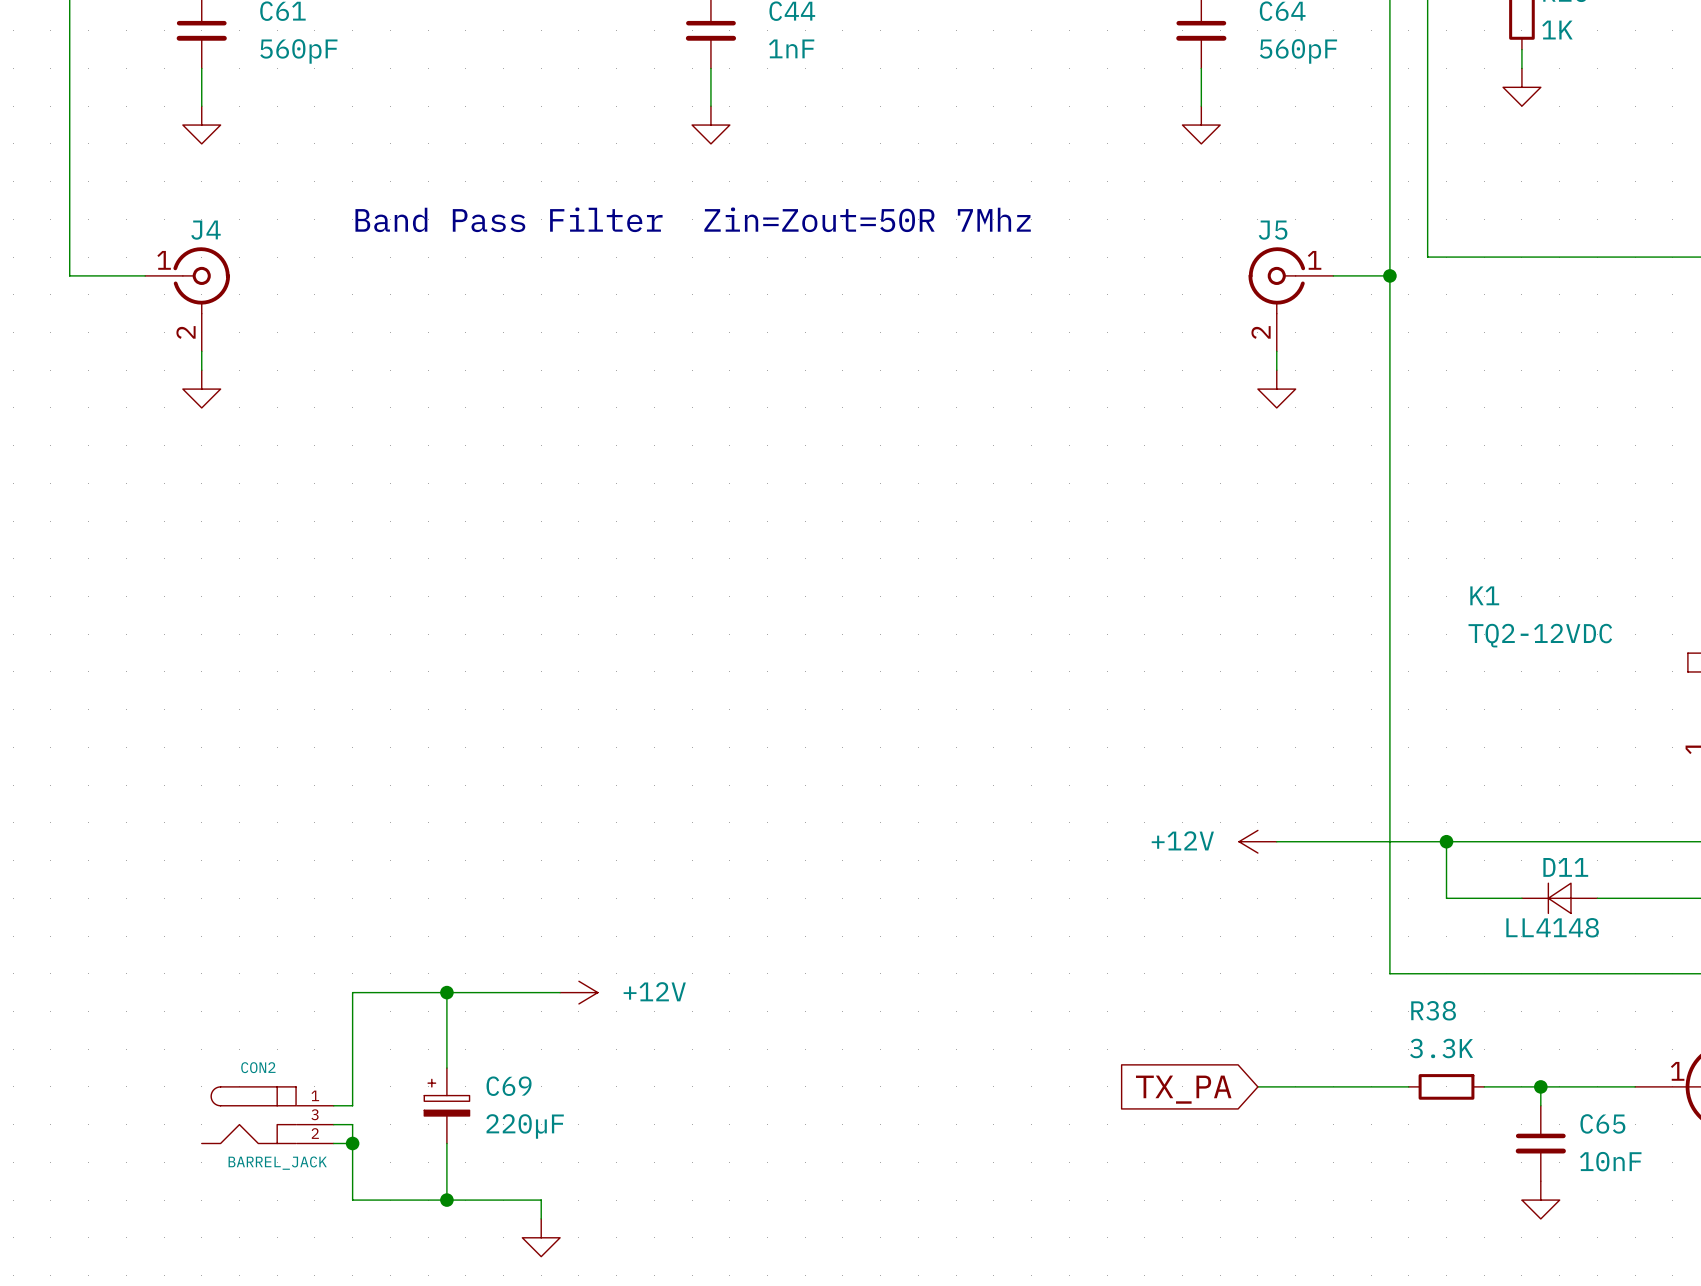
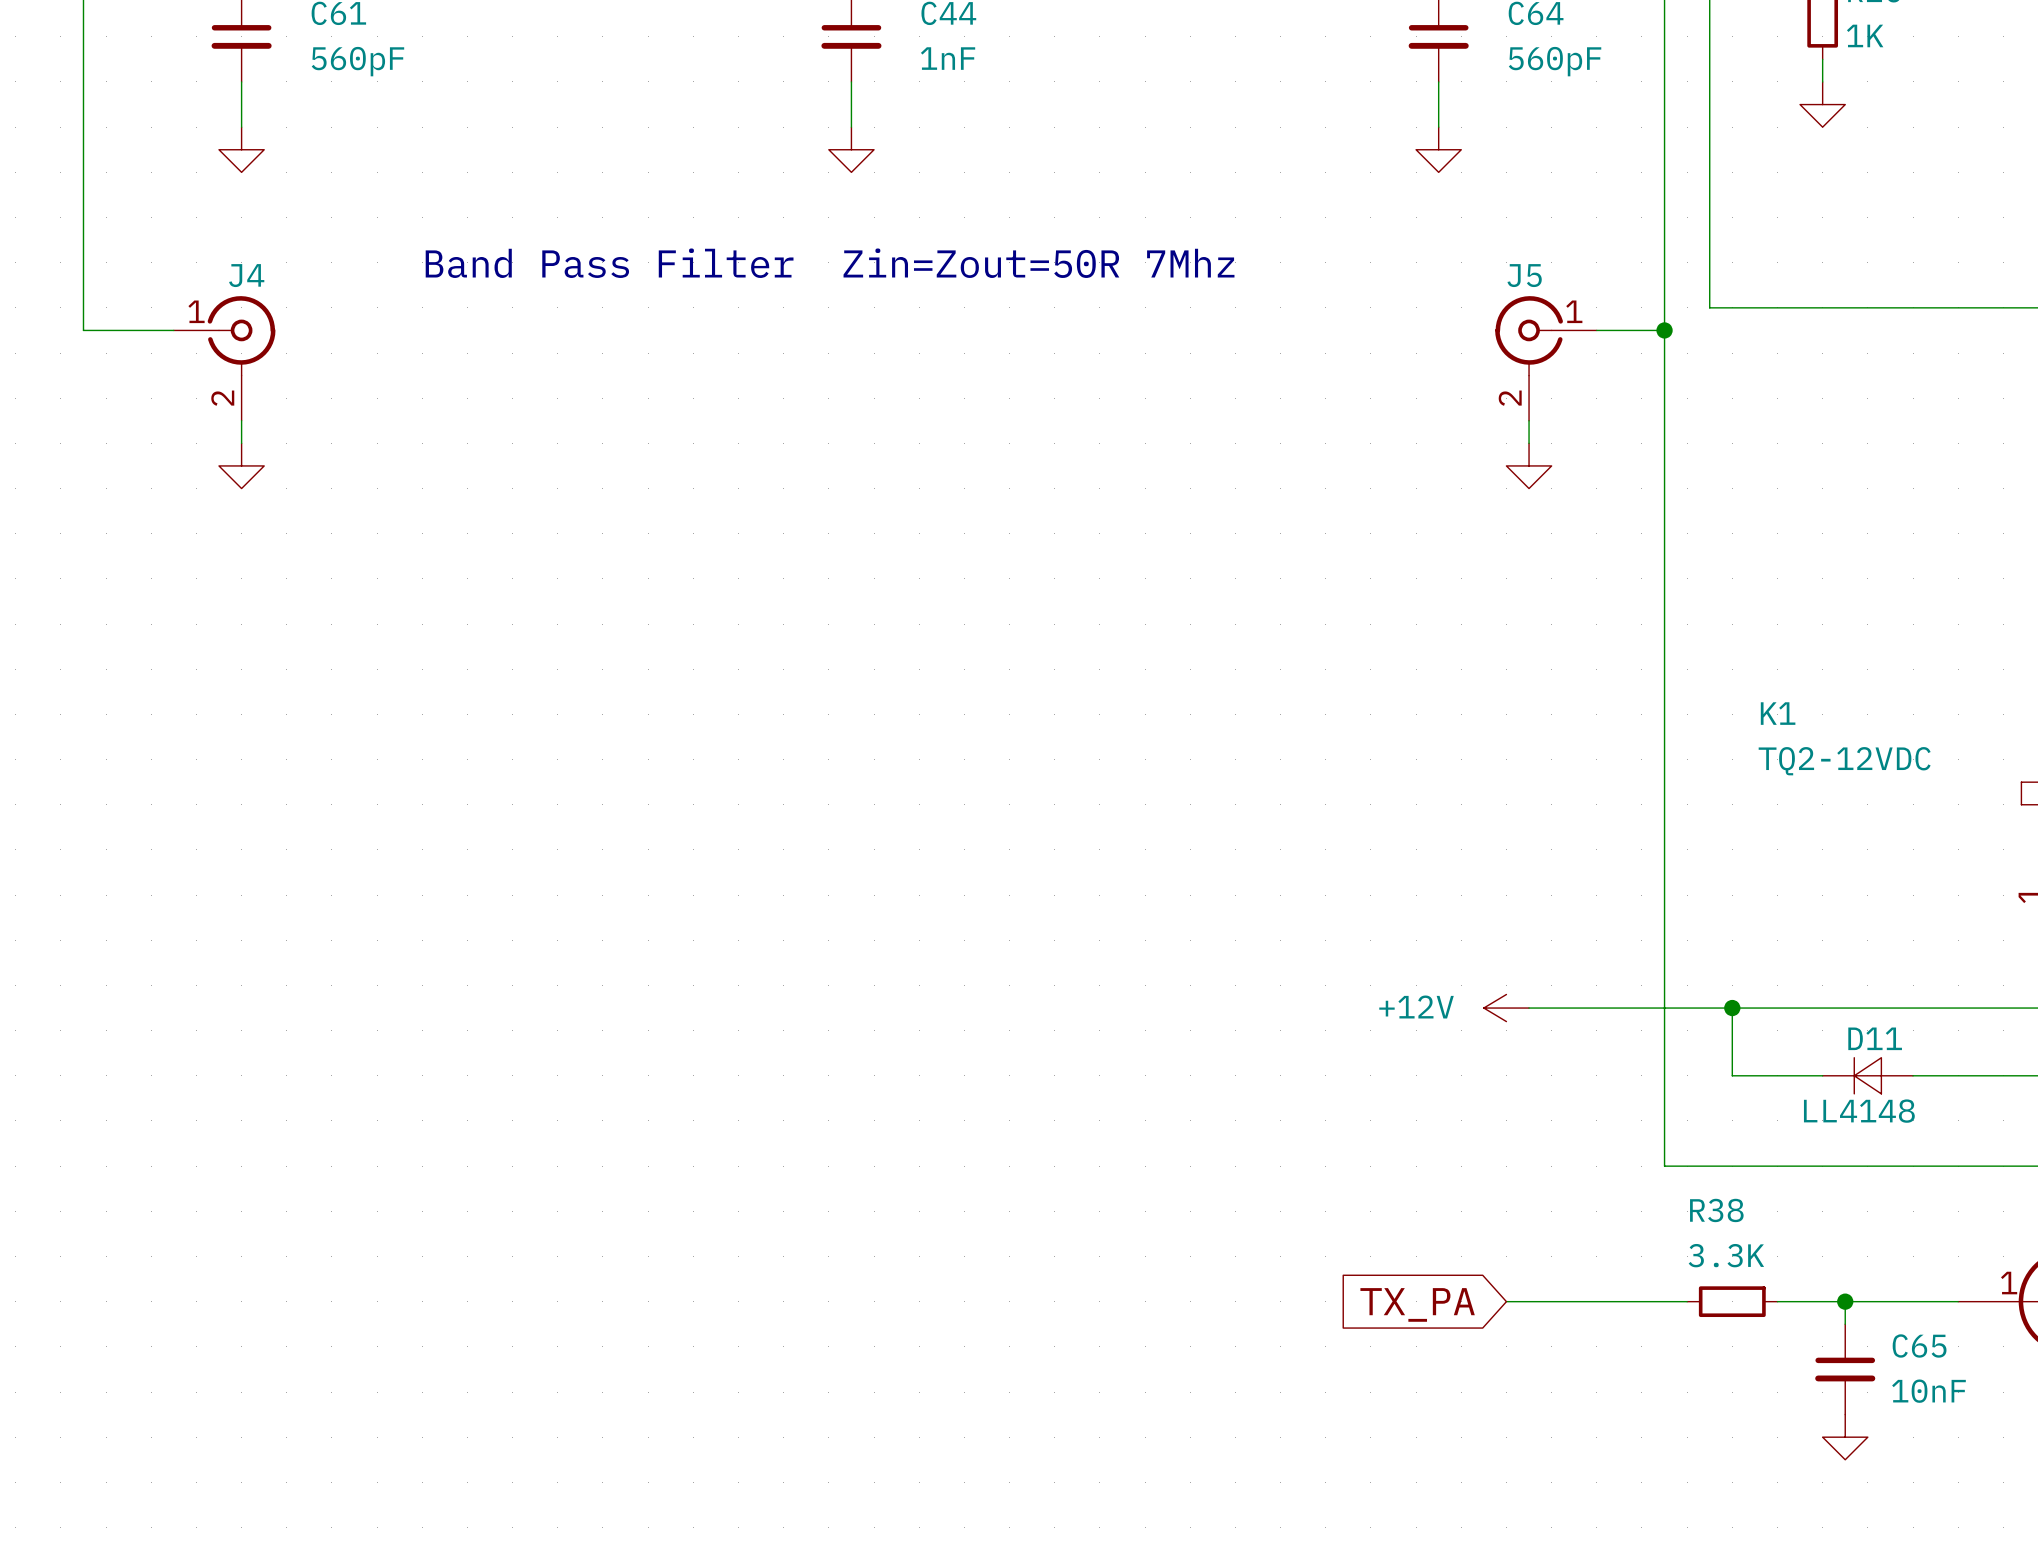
wire: (446, 992) (446, 1068) -> none
junction: (446, 992) -> none
wire: (560, 992) (352, 992) (352, 1105) (333, 1105) -> none
power symbol: +12V (578, 992) -> none
CON2: BARREL_JACK (211, 1105) -> none
C69: 220µF (446, 1105) -> none
wire: (333, 1124) (352, 1124) (352, 1200) (541, 1200) (541, 1218) -> none
wire: (333, 1143) (352, 1143) -> none
junction: (352, 1143) -> none
wire: (446, 1143) (446, 1200) -> none
junction: (446, 1200) -> none
power symbol: (541, 1237) -> none

